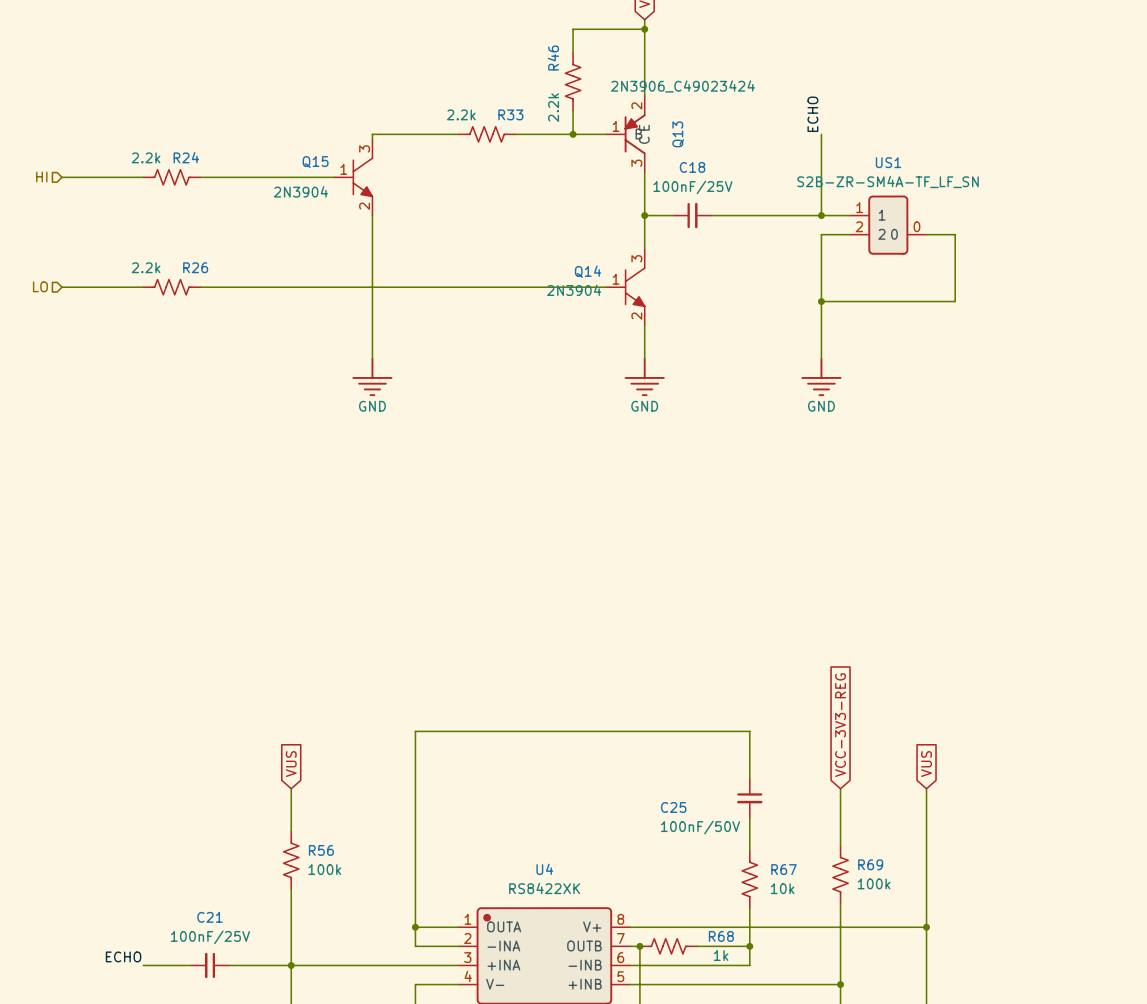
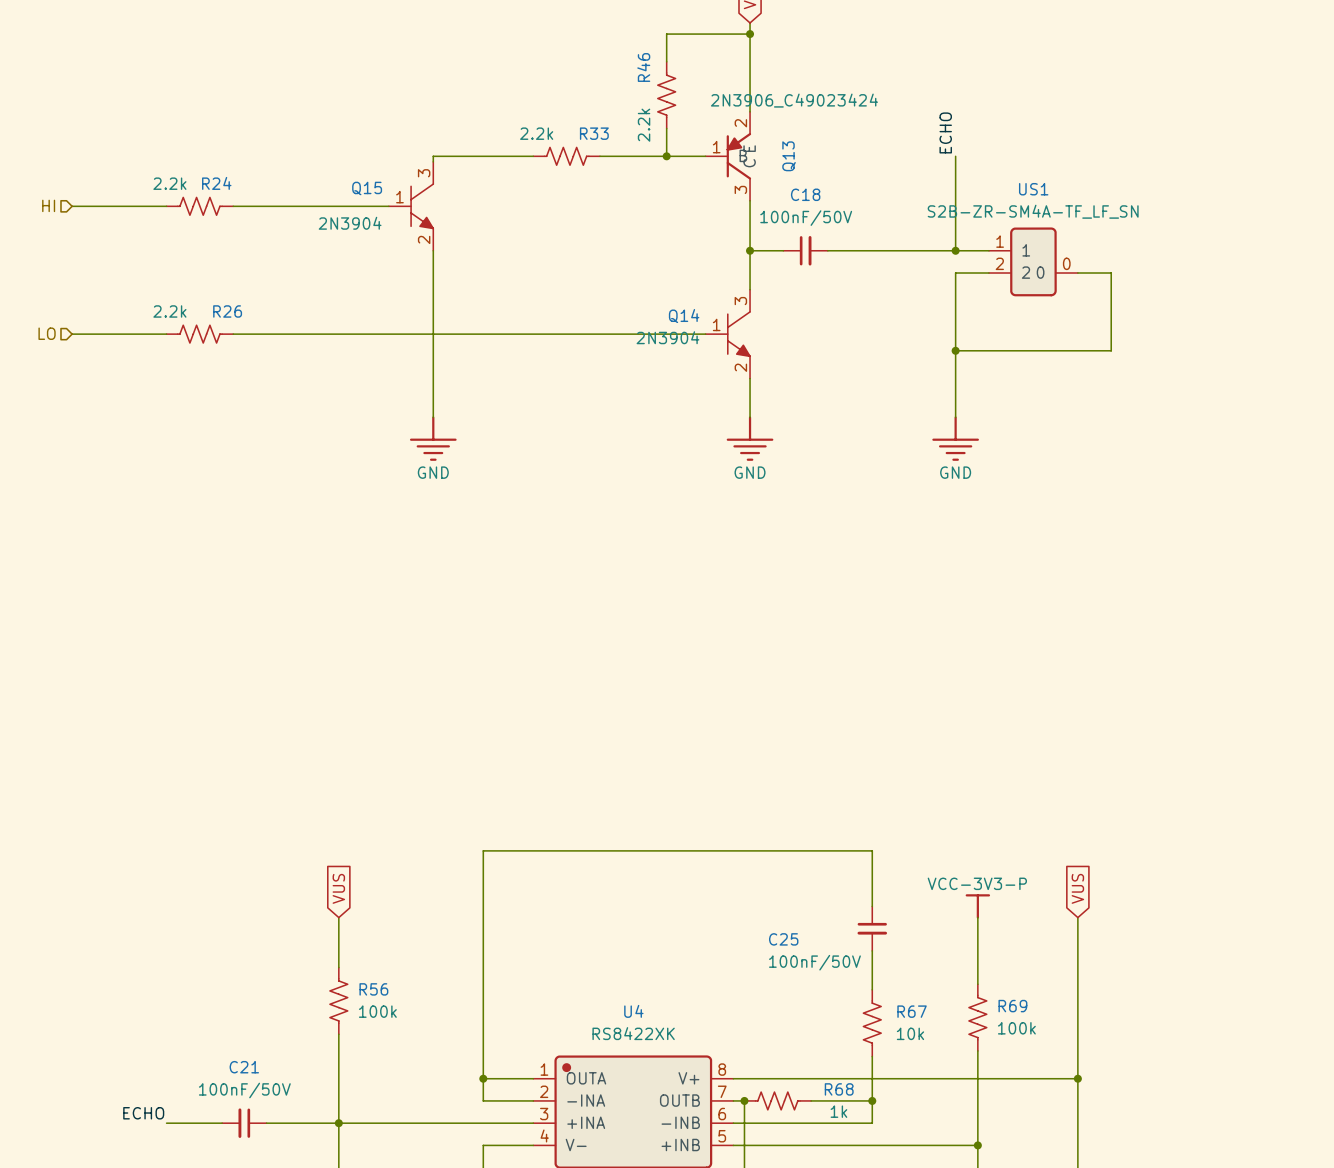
C18 value: 100nF/25V (692, 187) -> 100nF/50V (806, 218)
global label: VCC-3V3-REG (840, 725) -> none
power symbol: none -> VCC-3V3-P (977, 906)
C21 value: 100nF/25V (210, 937) -> 100nF/50V (244, 1090)

